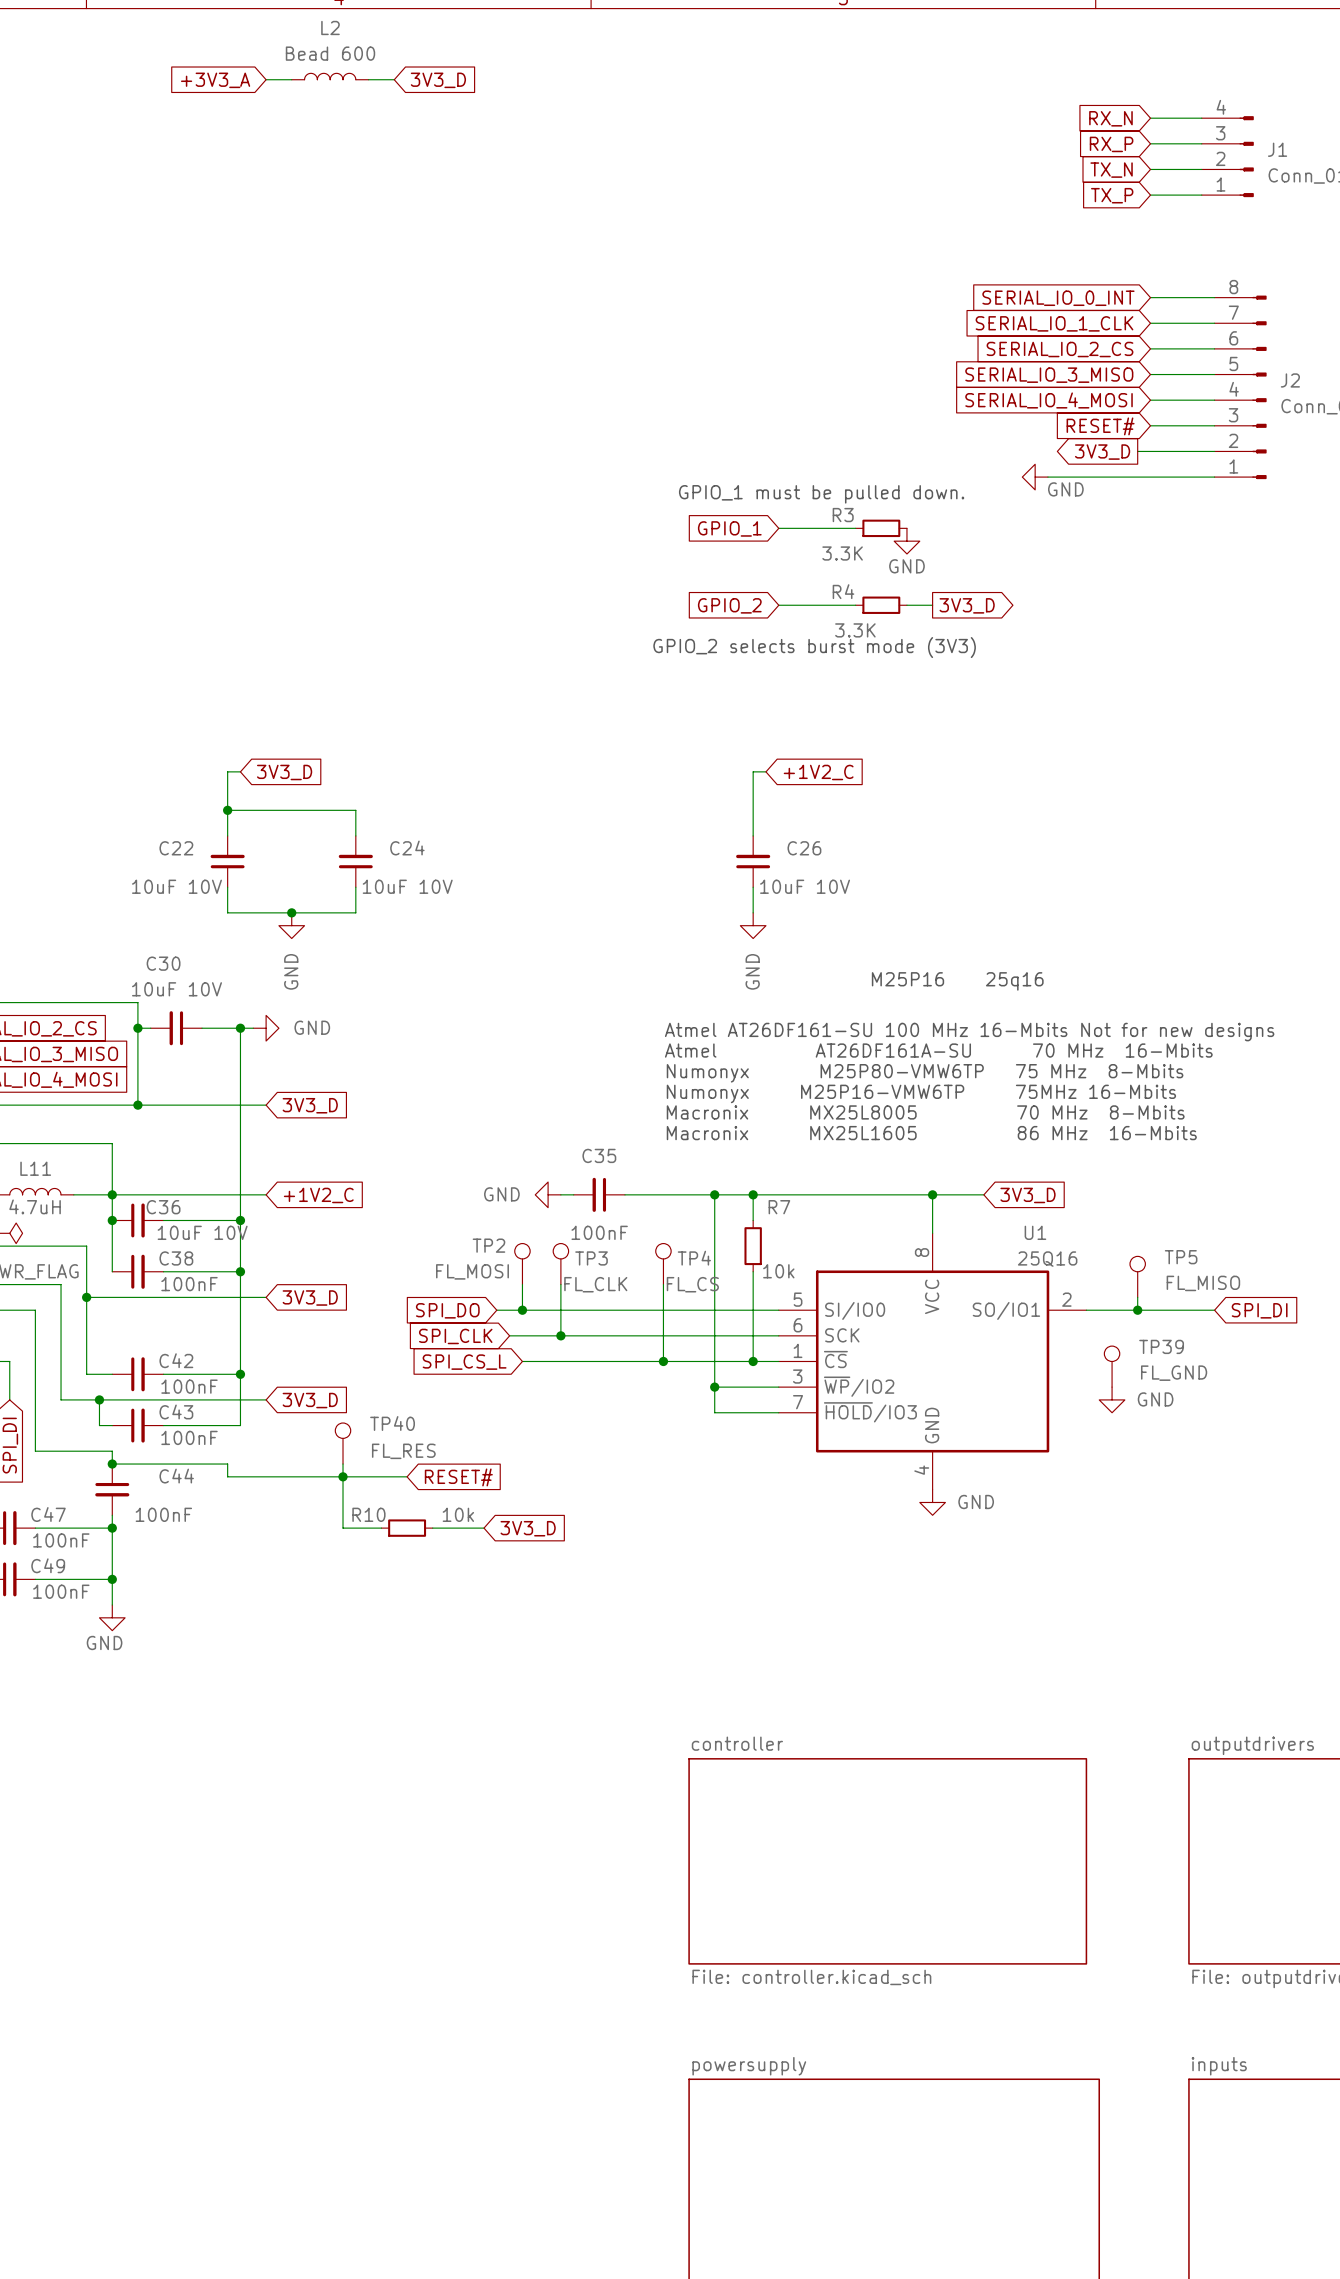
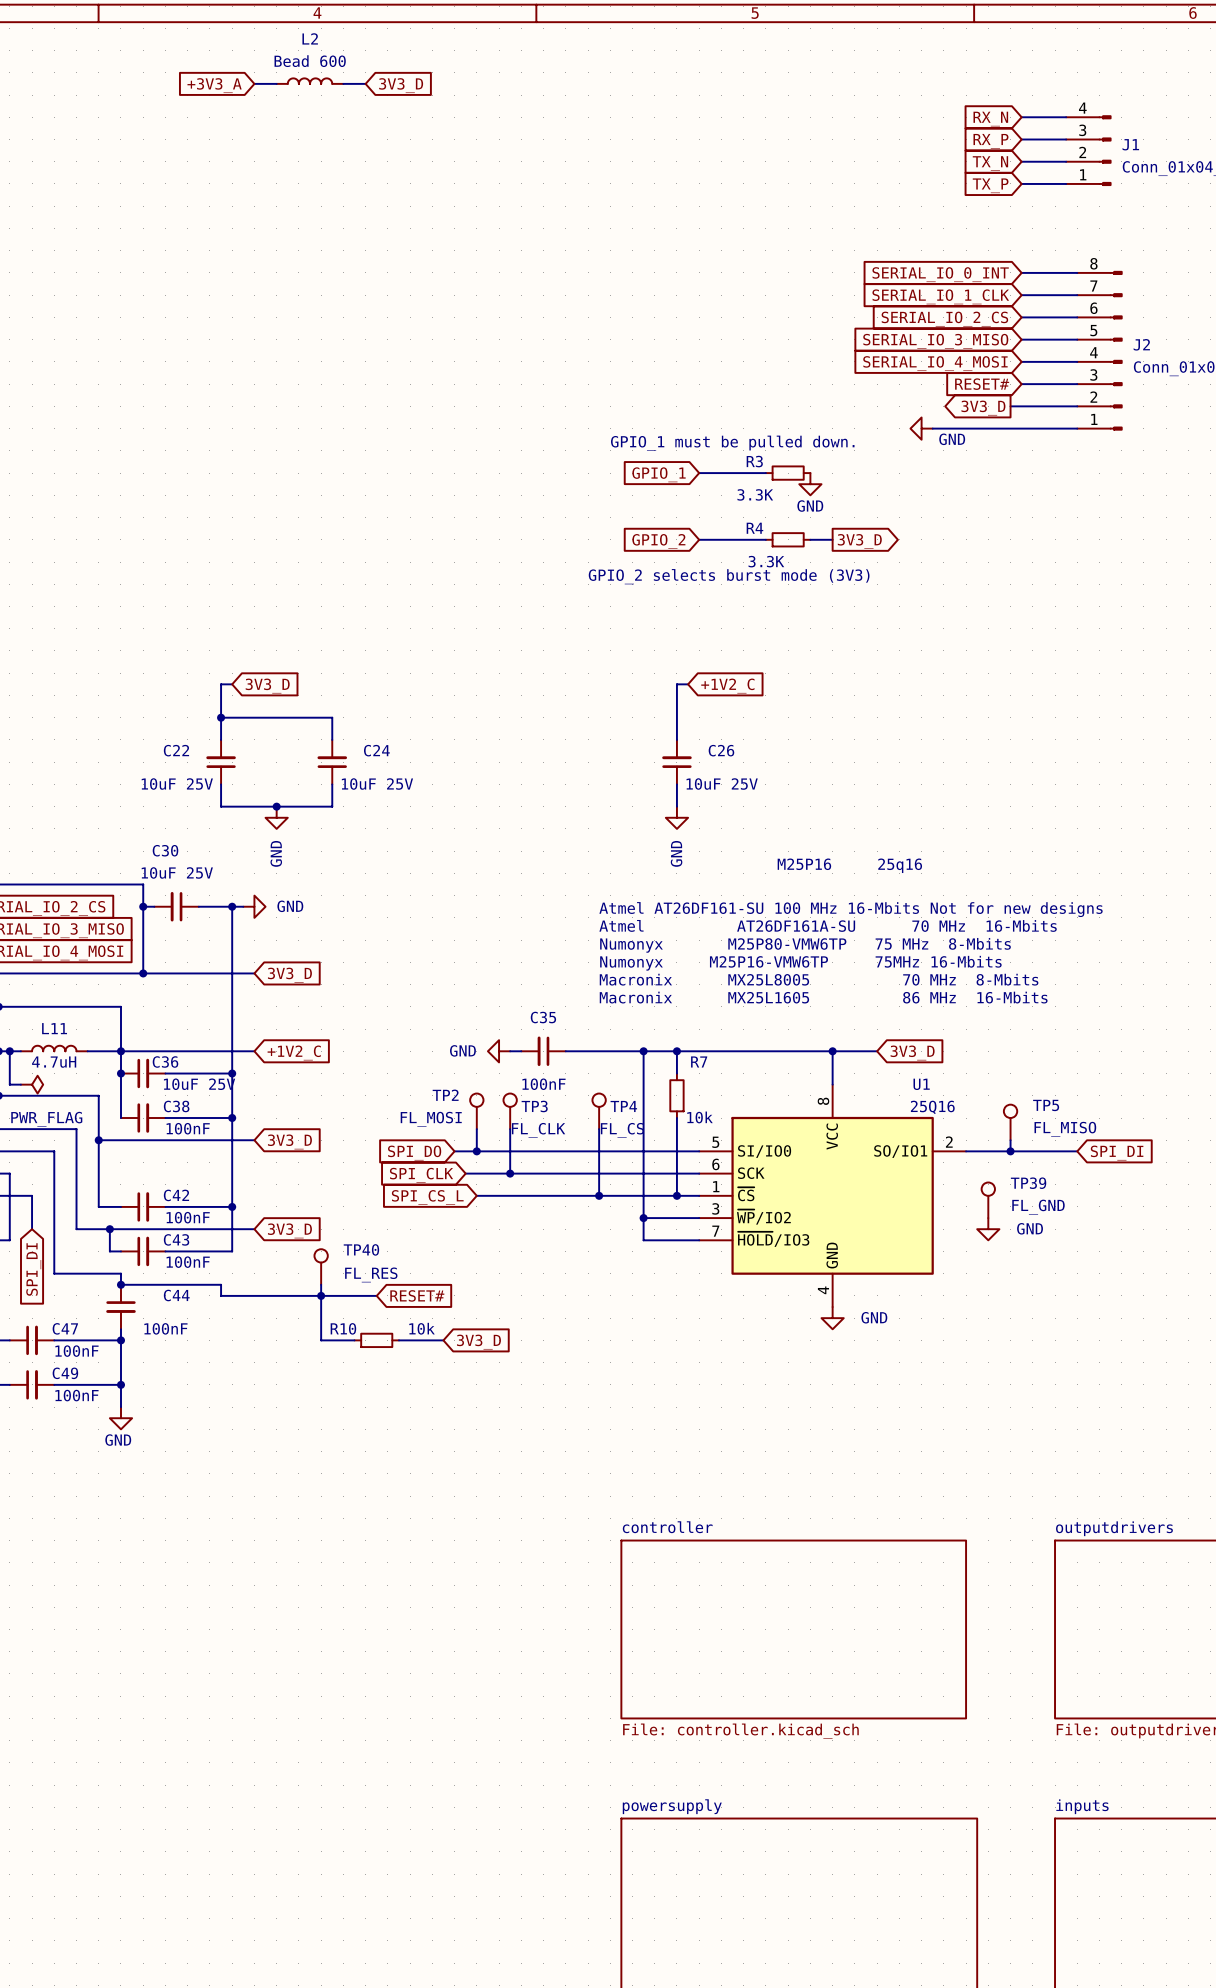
C22 value: 10uF 10V (176, 886) -> 10uF 25V (177, 784)
C24 value: 10uF 10V (407, 886) -> 10uF 25V (377, 784)
C26 value: 10uF 10V (805, 886) -> 10uF 25V (722, 784)
C30 value: 10uF 10V (176, 989) -> 10uF 25V (177, 872)
C36 value: 10uF 10V (202, 1232) -> 10uF 25V (199, 1084)

